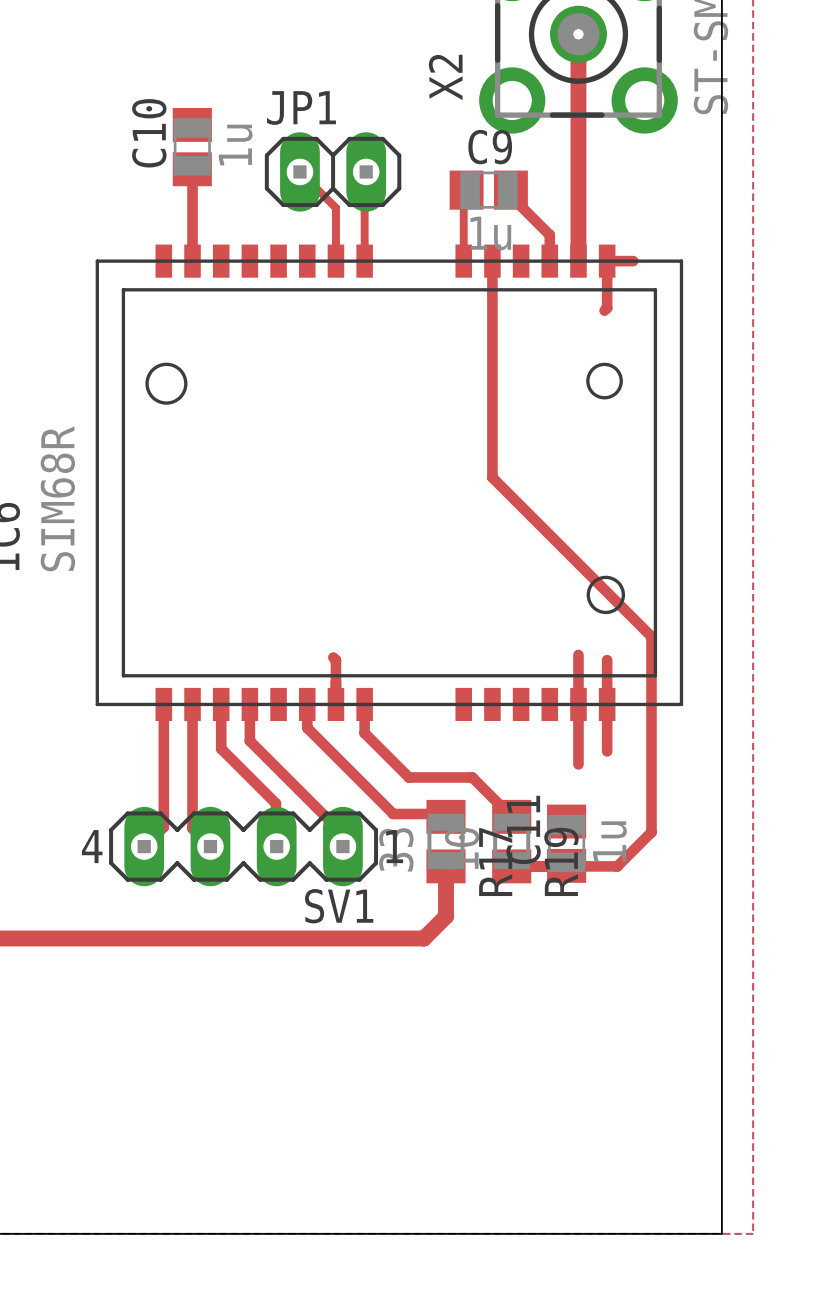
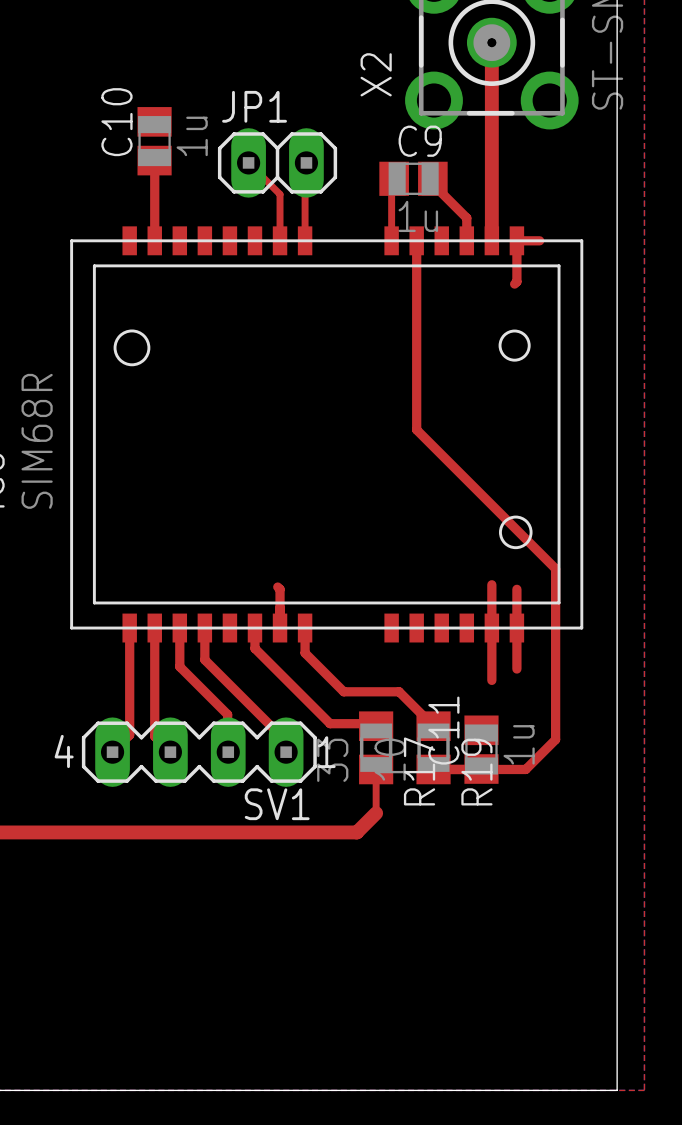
top track width: thick (446, 866) (446, 916) -> thin (376, 769) (376, 813)

